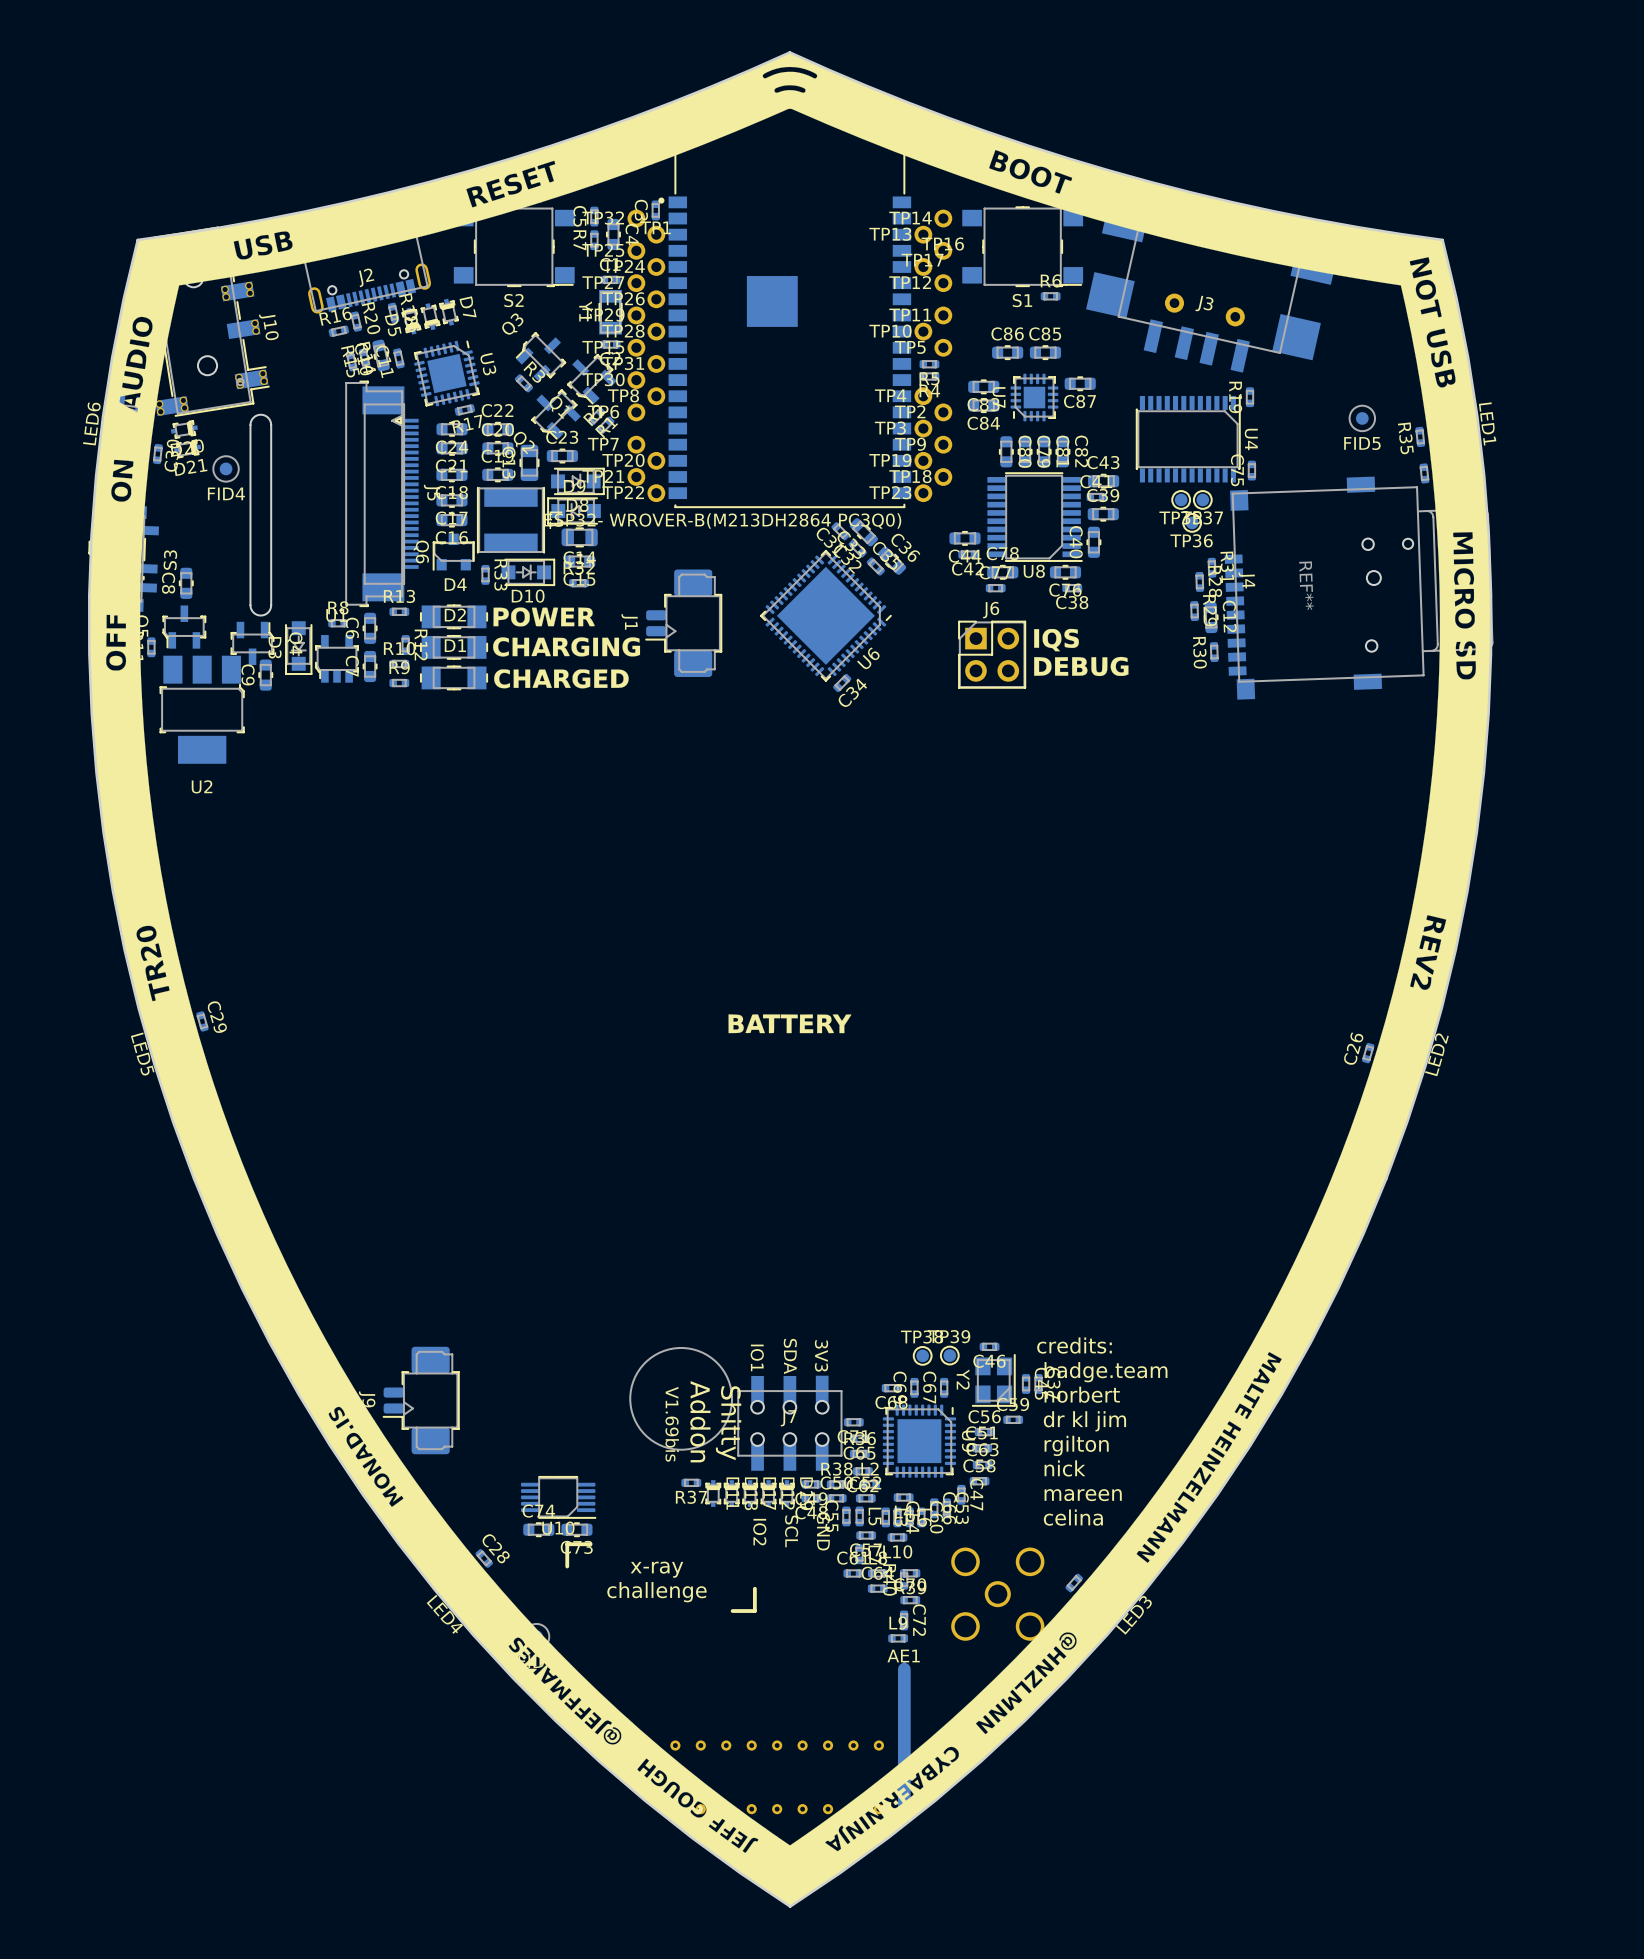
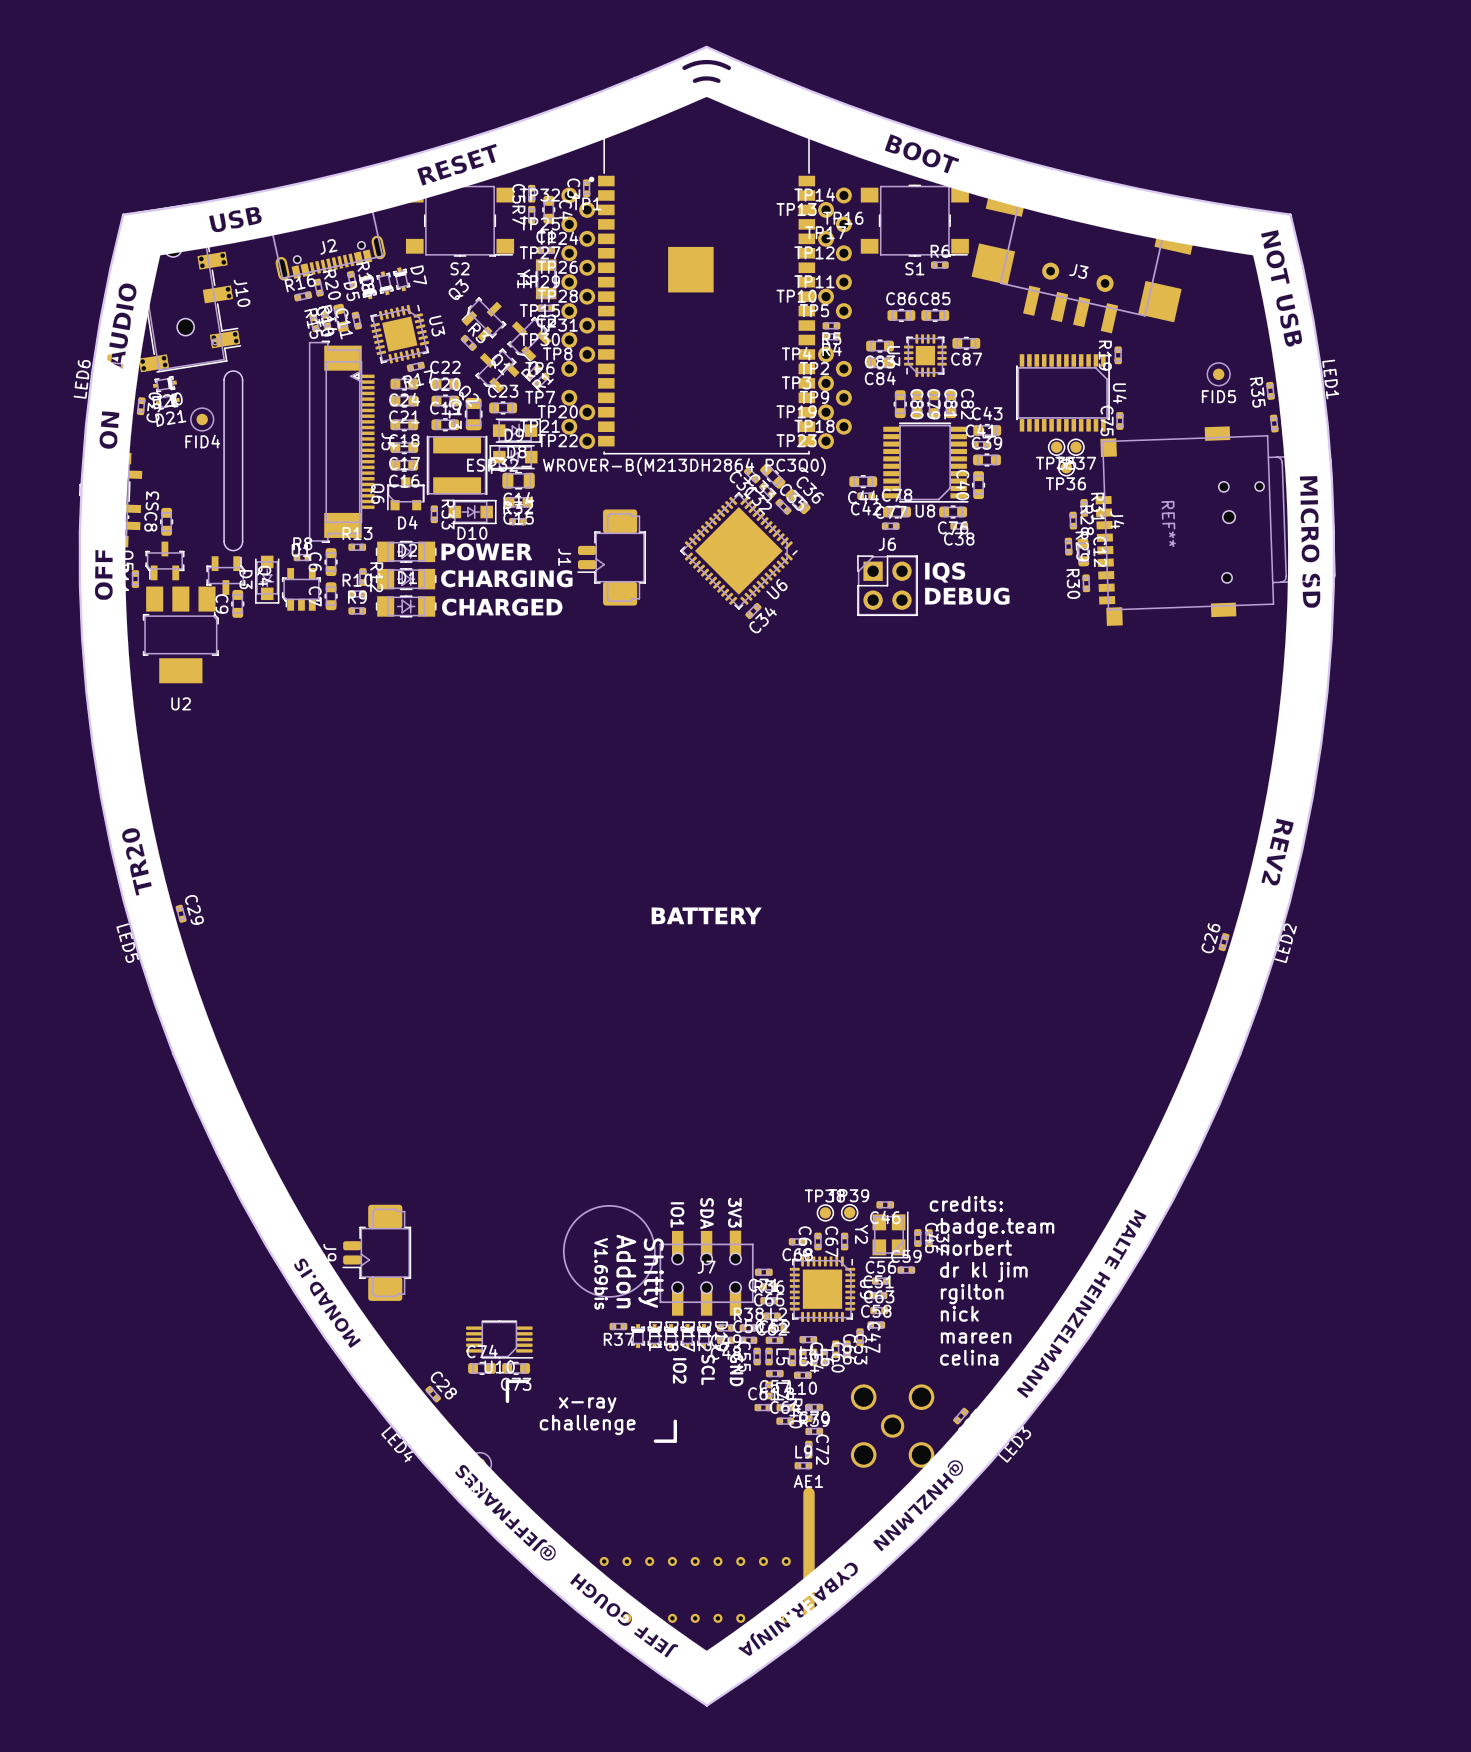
D4 footprint: [420, 604, 488, 629] -> [376, 541, 437, 563]
D2 footprint: [420, 635, 488, 660] -> [376, 568, 437, 590]
D1 footprint: [420, 665, 488, 691] -> [376, 595, 437, 618]

